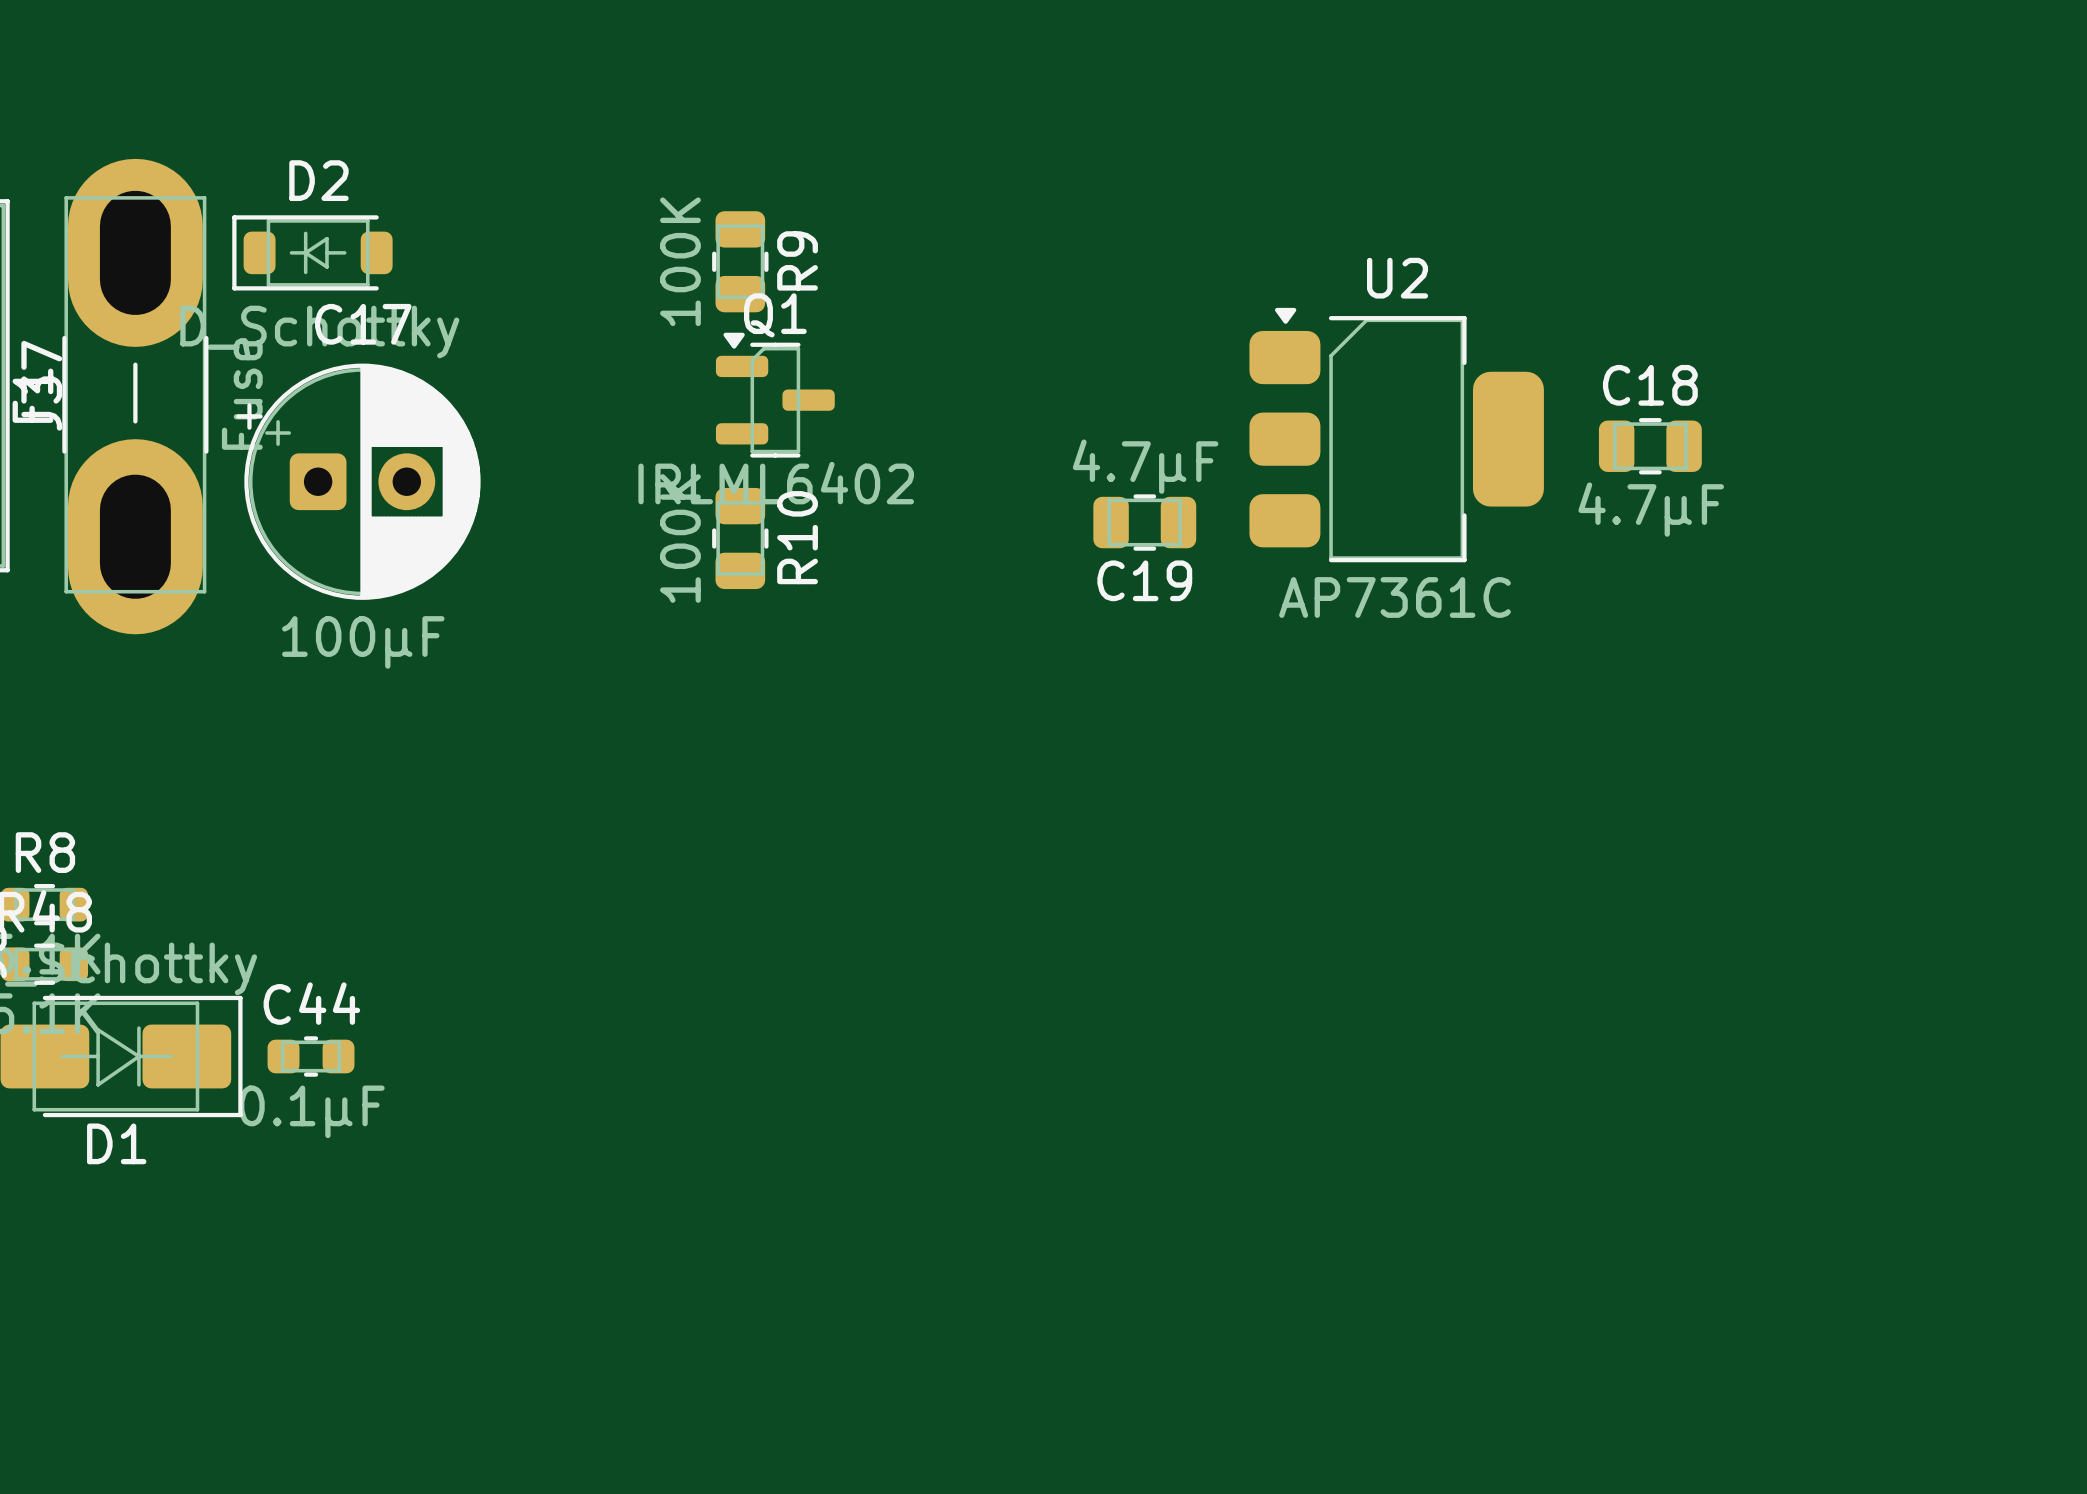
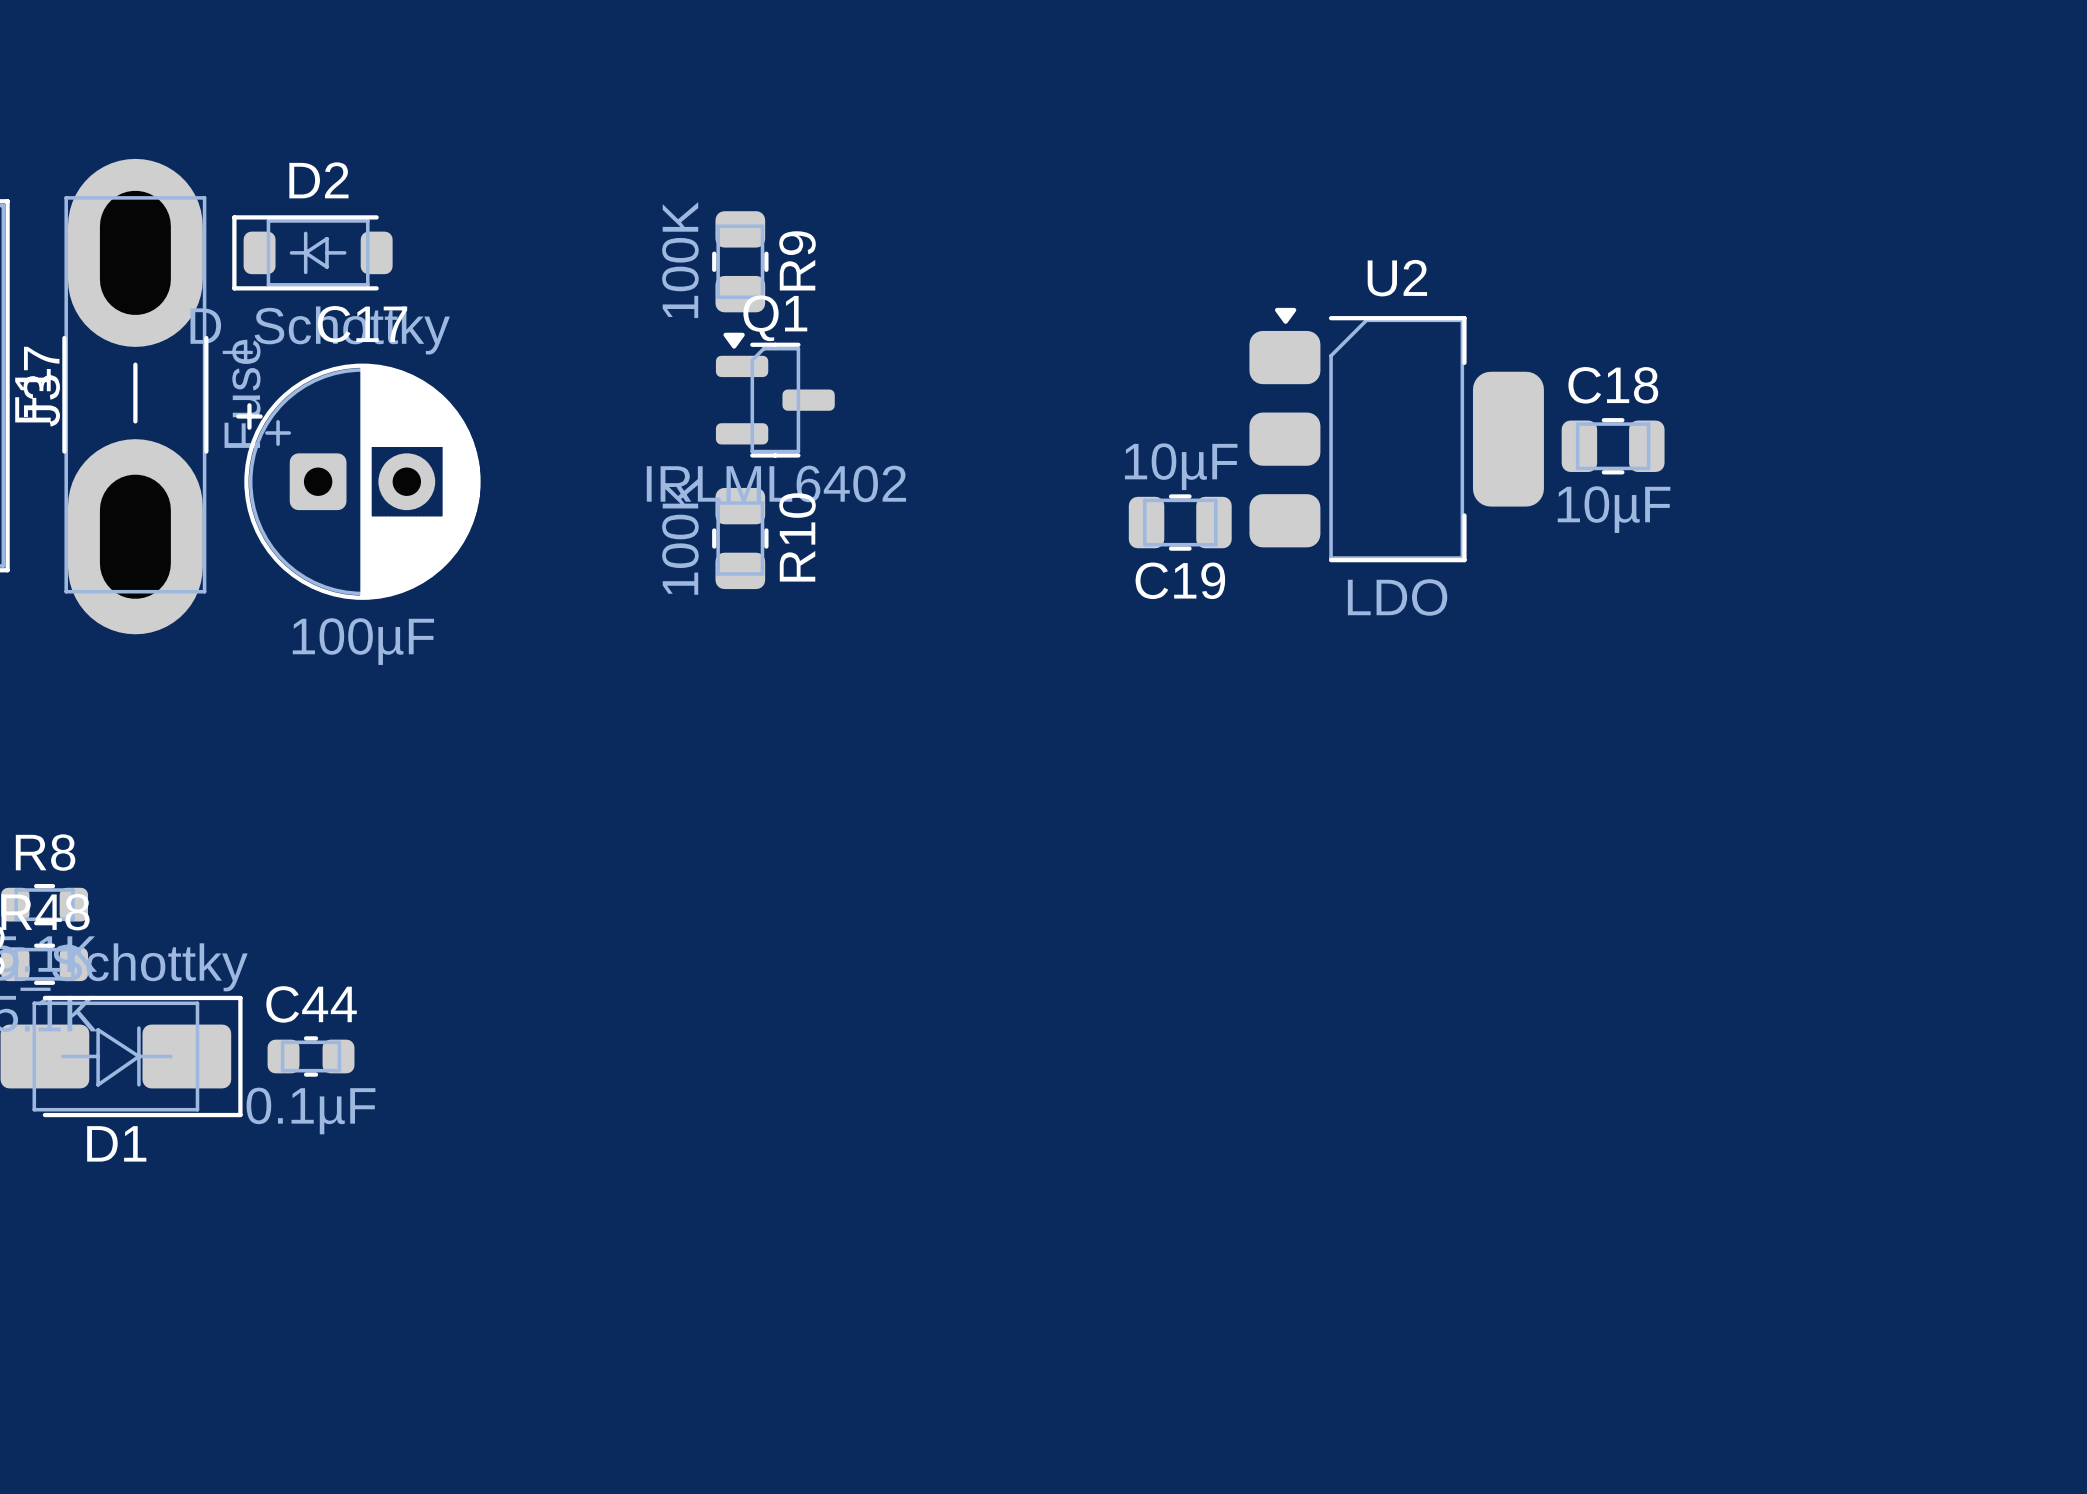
C18 position: (1650, 446) -> (1613, 446)
C19 value: 4.7µF (1145, 466) -> 10µF (1181, 466)
C18 value: 4.7µF (1651, 509) -> 10µF (1614, 509)
C19 position: (1144, 522) -> (1180, 522)
U2 value: AP7361C (1395, 597) -> LDO (1397, 597)

